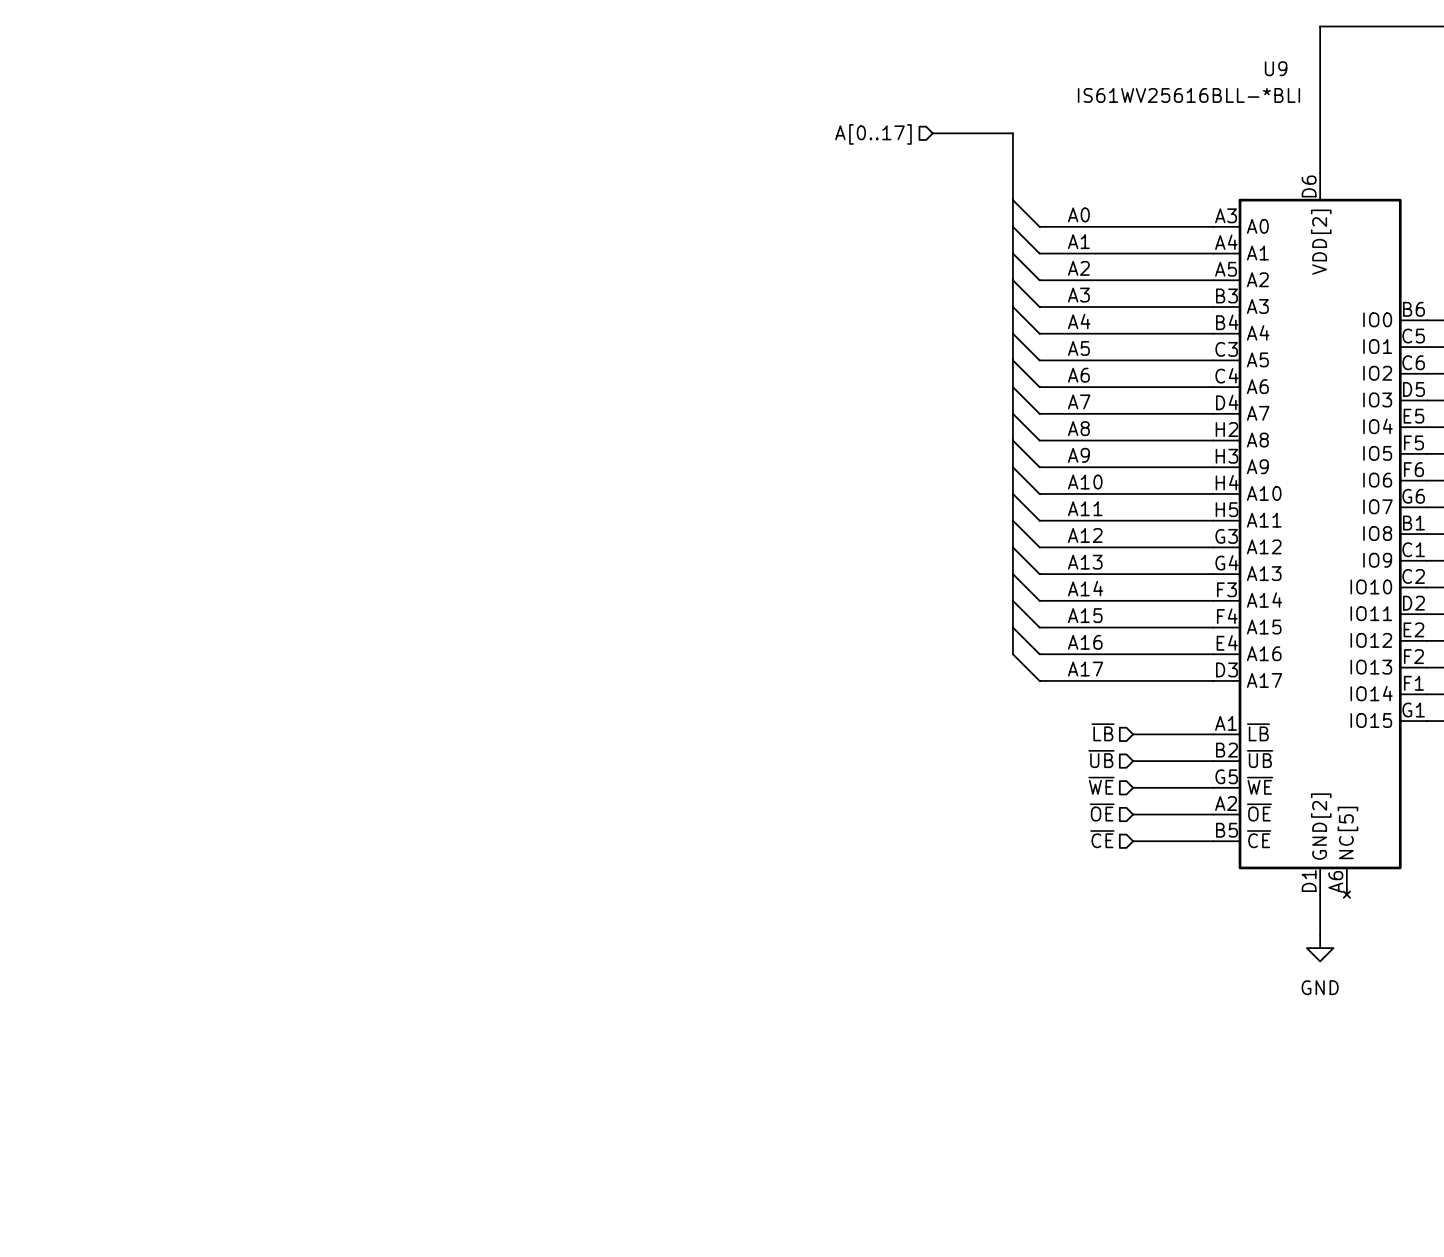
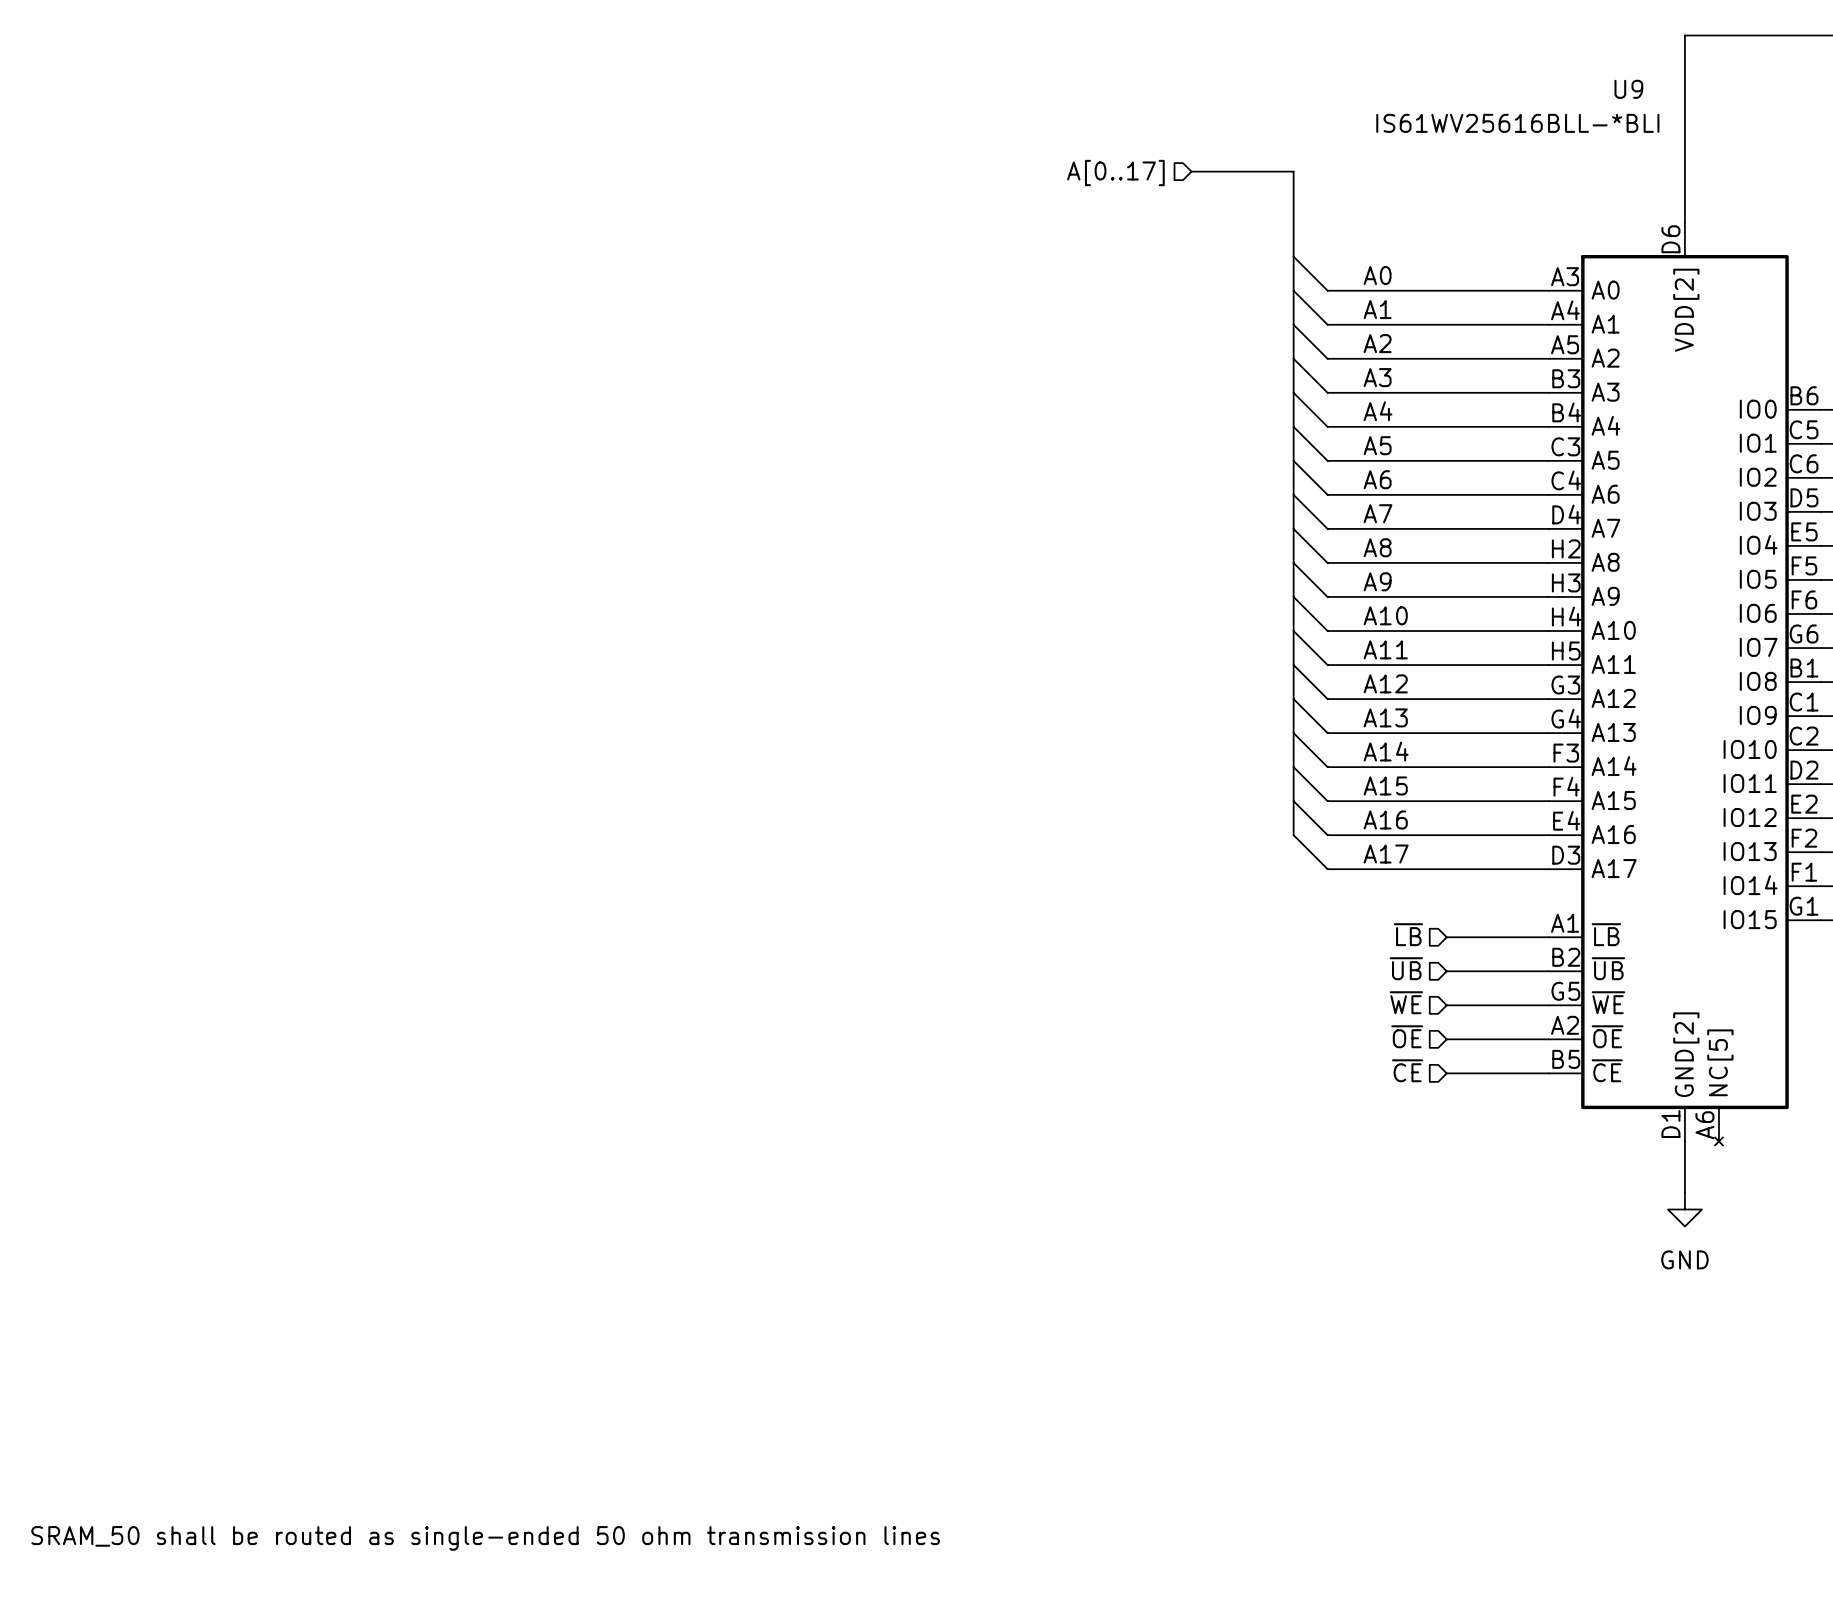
text: none -> SRAM_50 shall be routed as single-ended 50 ohm transmission lines (485, 1538)

